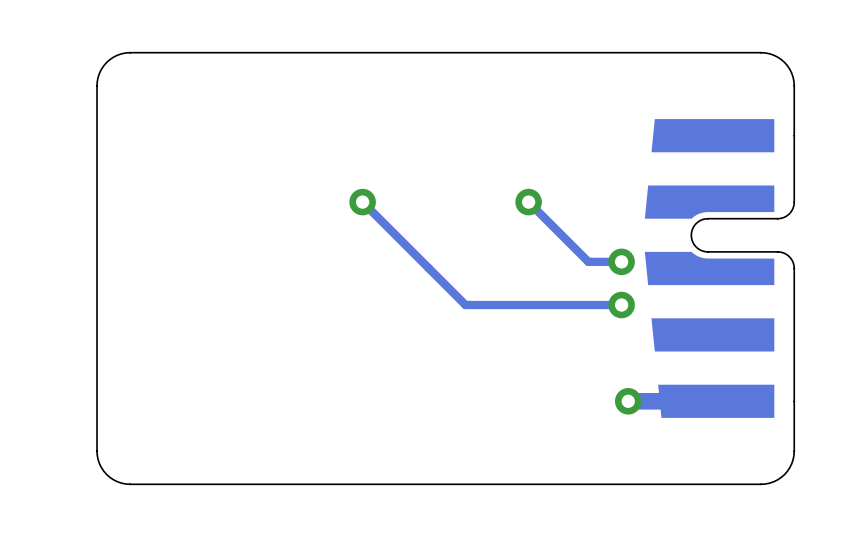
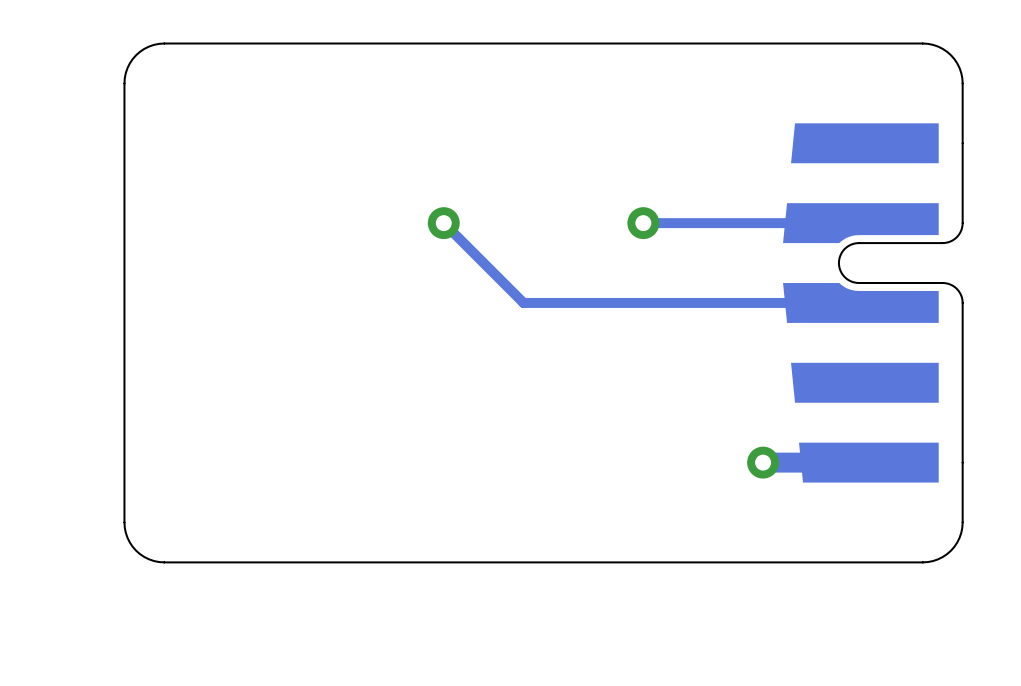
track: (528, 202) (588, 261) (621, 261) -> (643, 223) (878, 223)
via: (621, 261) -> none
track: (429, 268) (465, 305) (621, 305) -> (523, 302) (878, 302)
via: (621, 305) -> none

